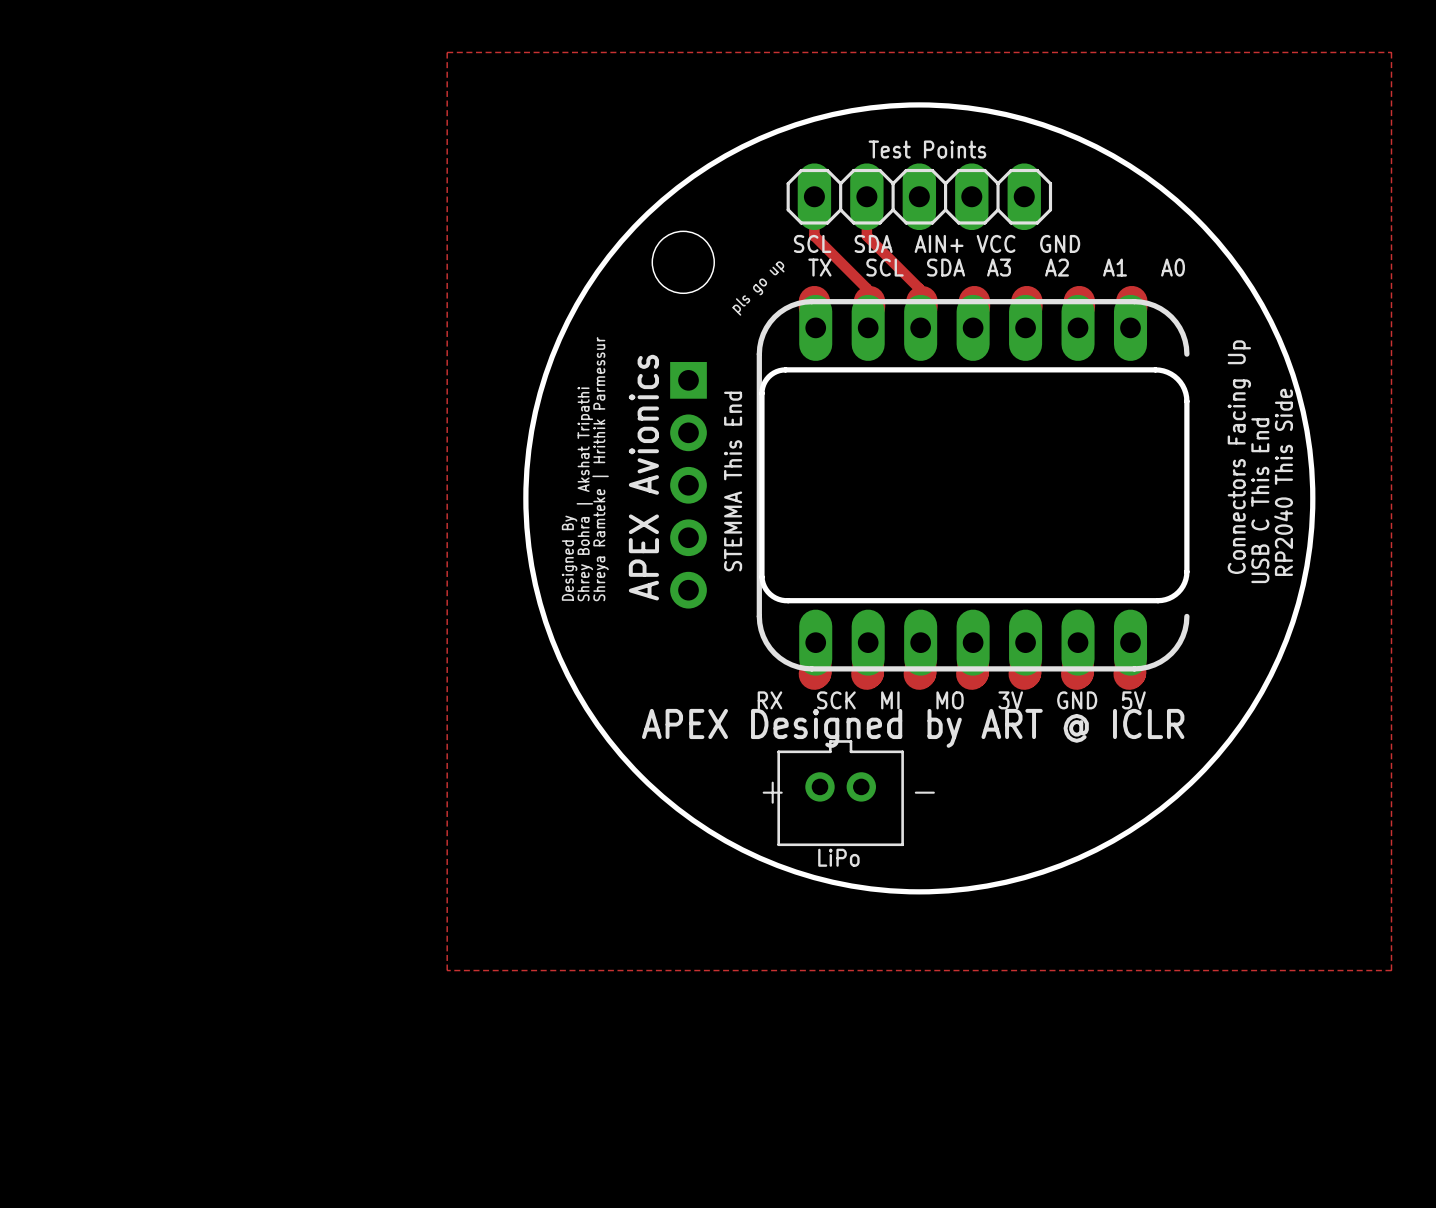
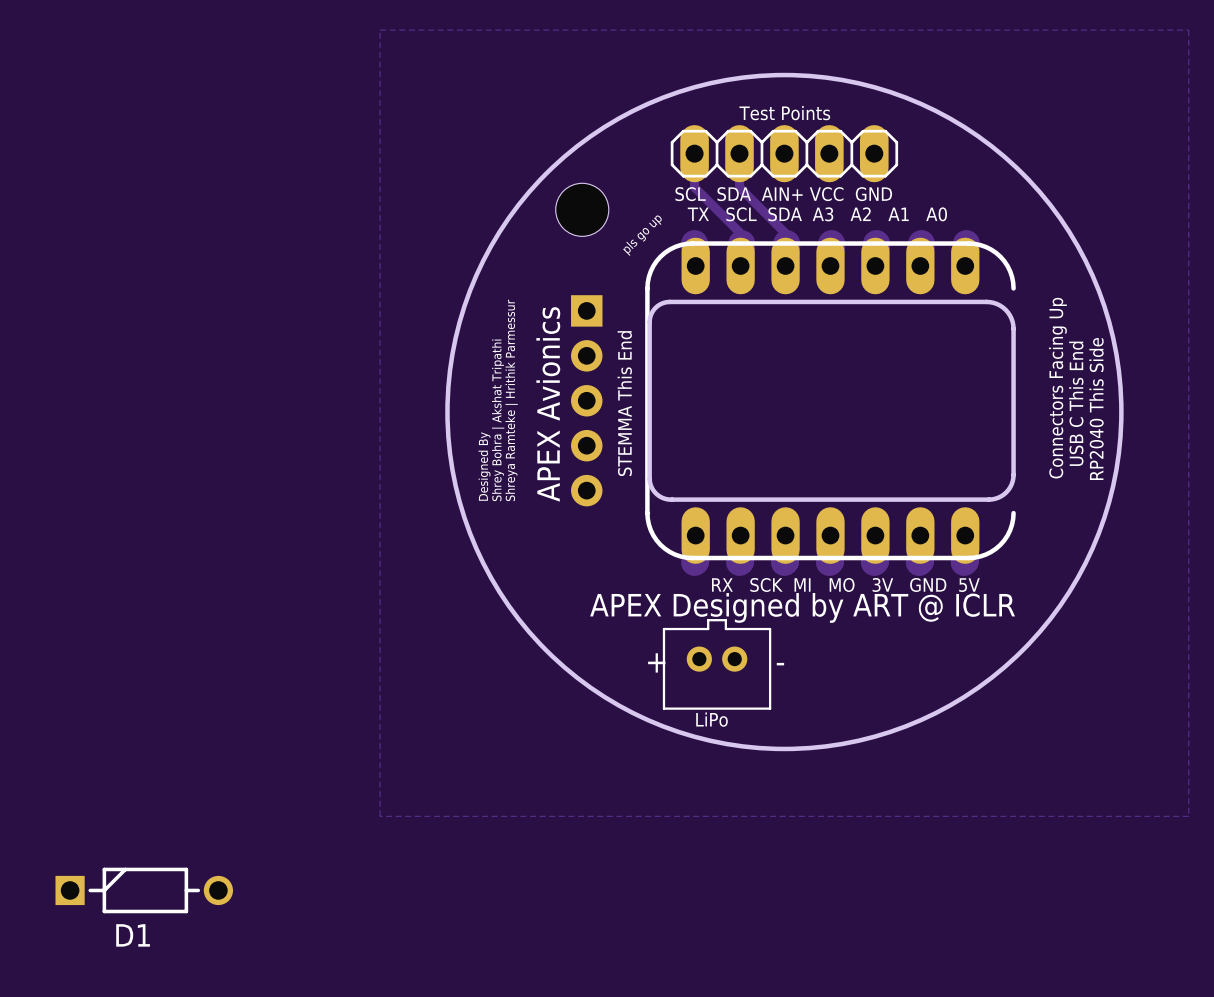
D1: none -> (144, 890)

